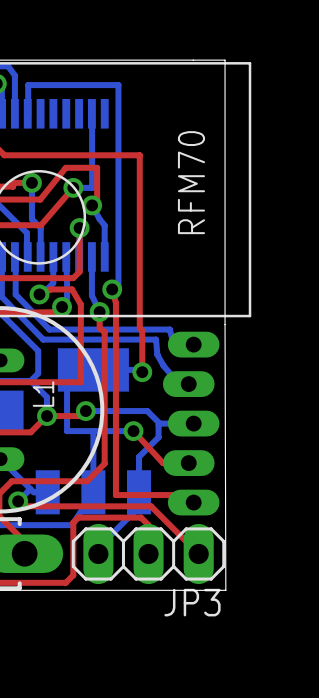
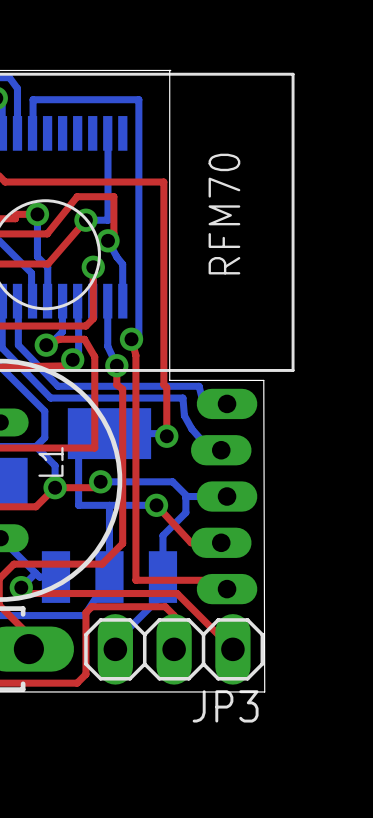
board edge: (145, 60) (225, 60) (225, 324) -> (169, 70) (169, 380) (263, 380)

